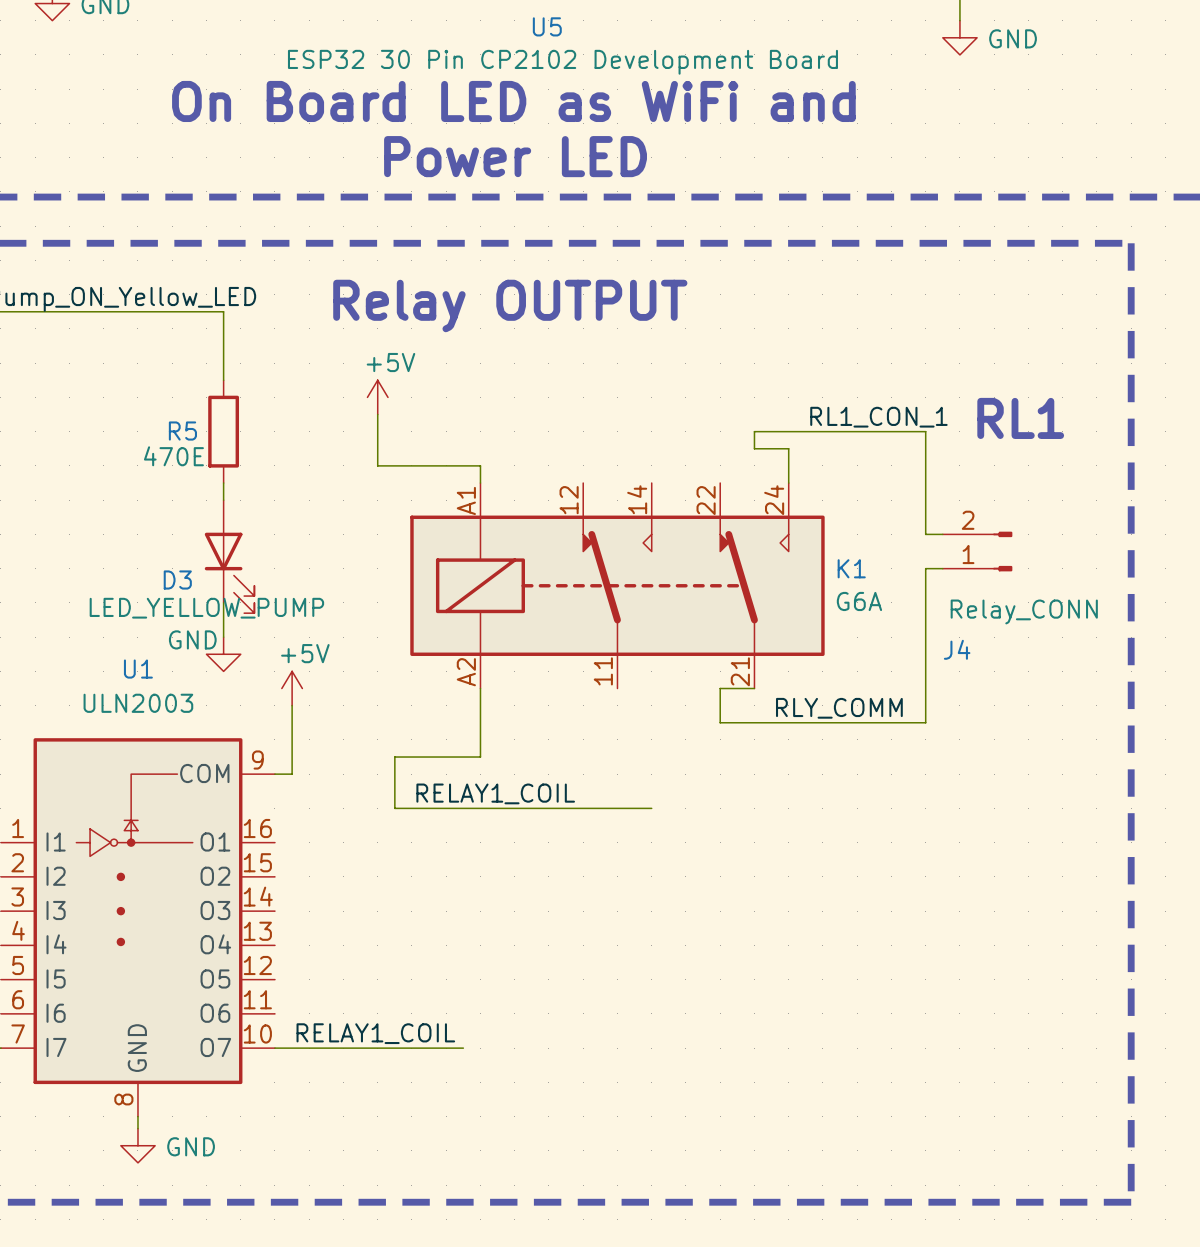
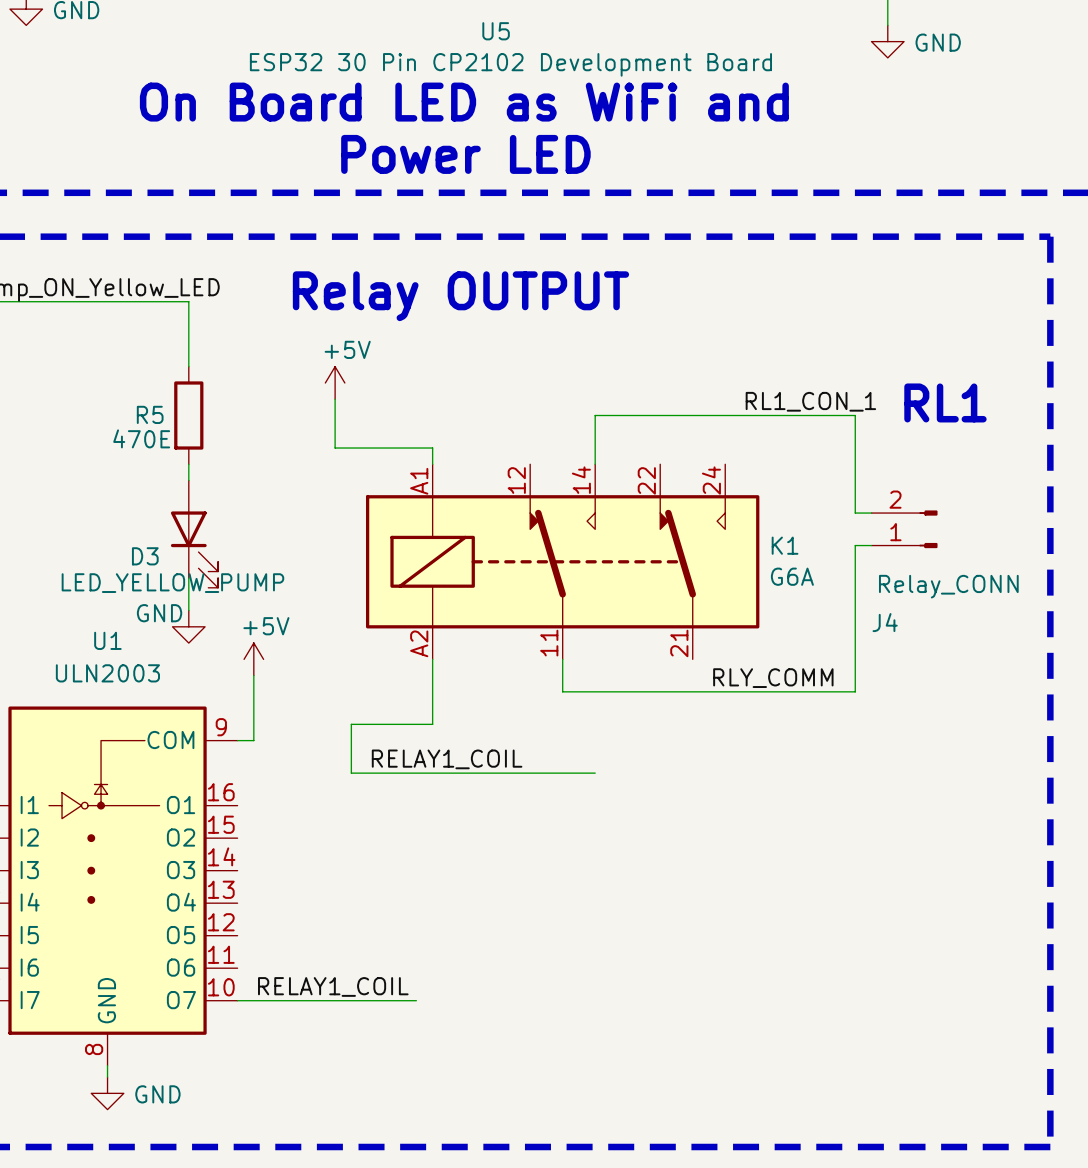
wire: (754, 431) (754, 448) (788, 448) (788, 483) -> (692, 415) (595, 415) (595, 464)
wire: (754, 688) (720, 688) (720, 722) -> (562, 659) (562, 691) (660, 691)

